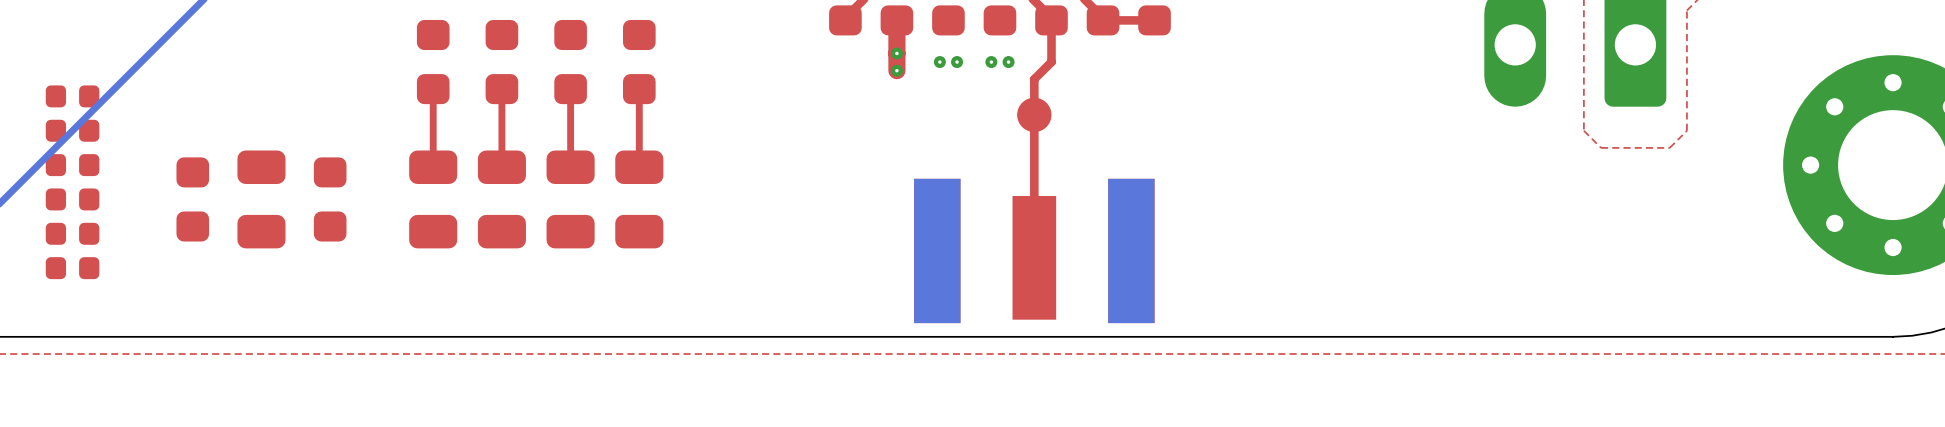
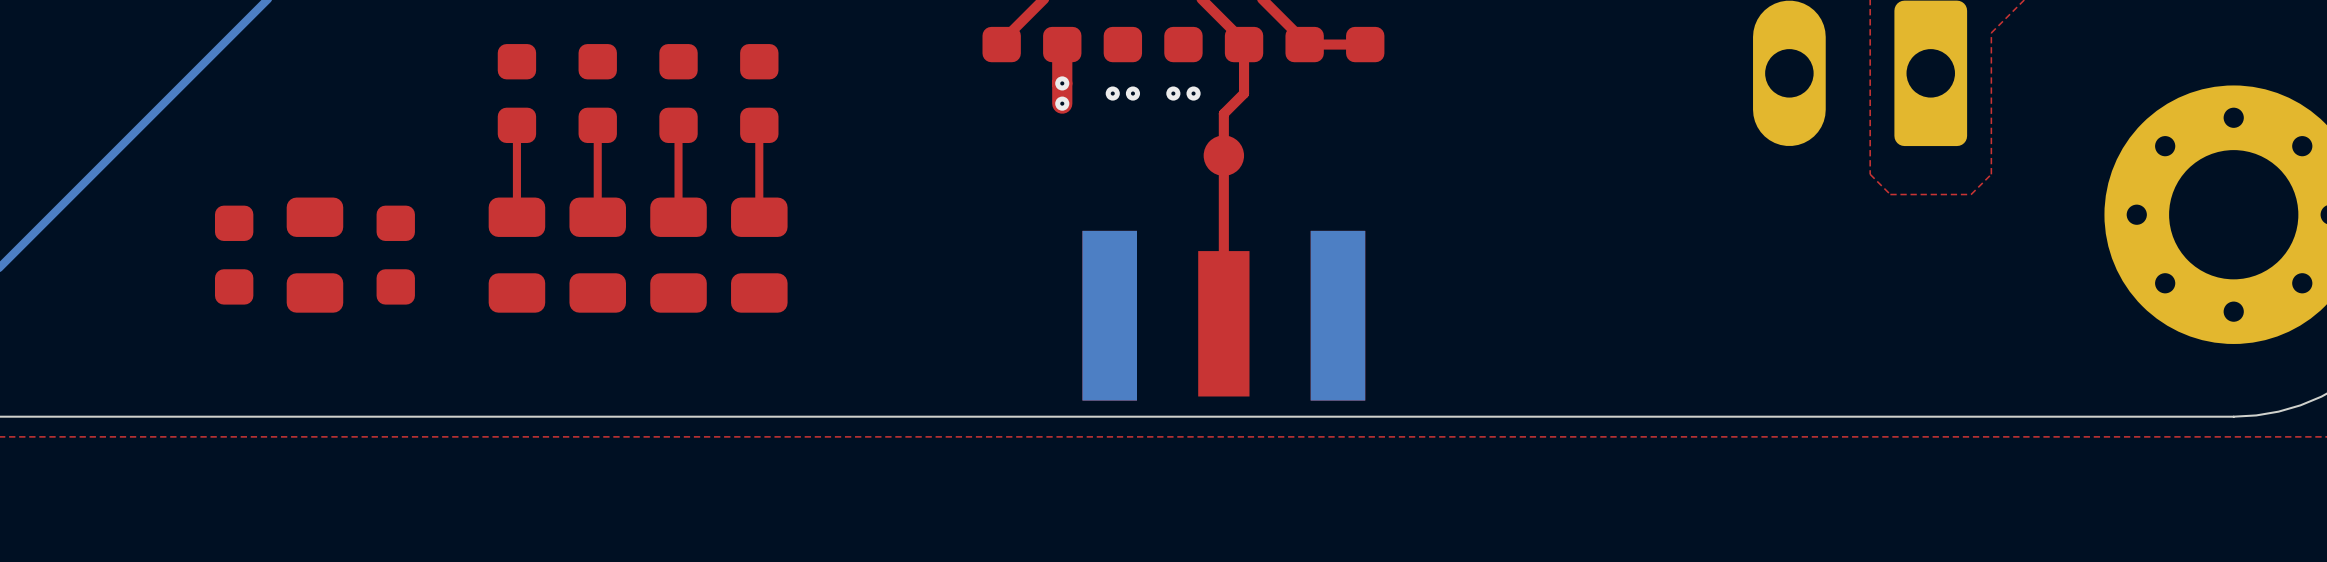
part: (72, 96) -> none
part: (72, 130) -> none
part: (72, 165) -> none
part: (72, 199) -> none
part: (72, 233) -> none
part: (72, 268) -> none

